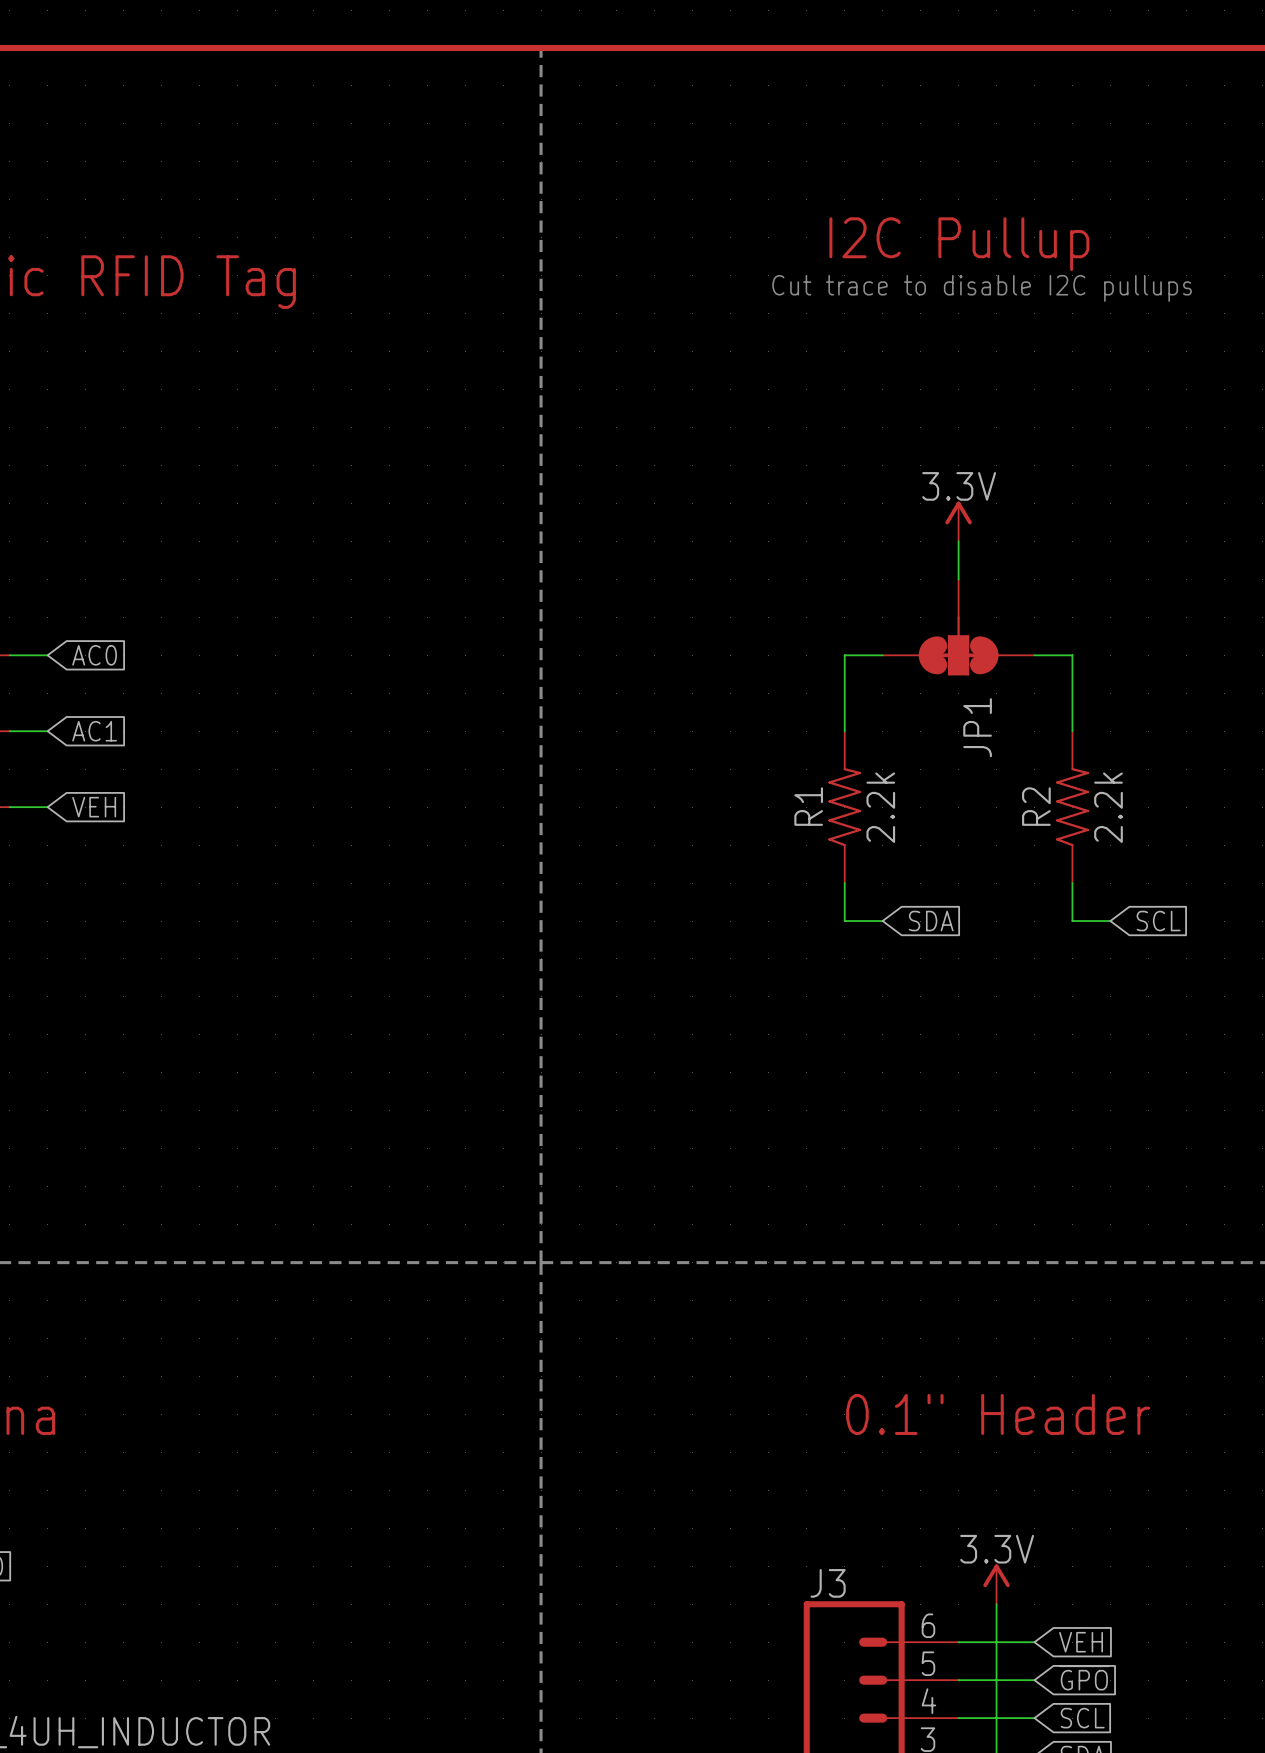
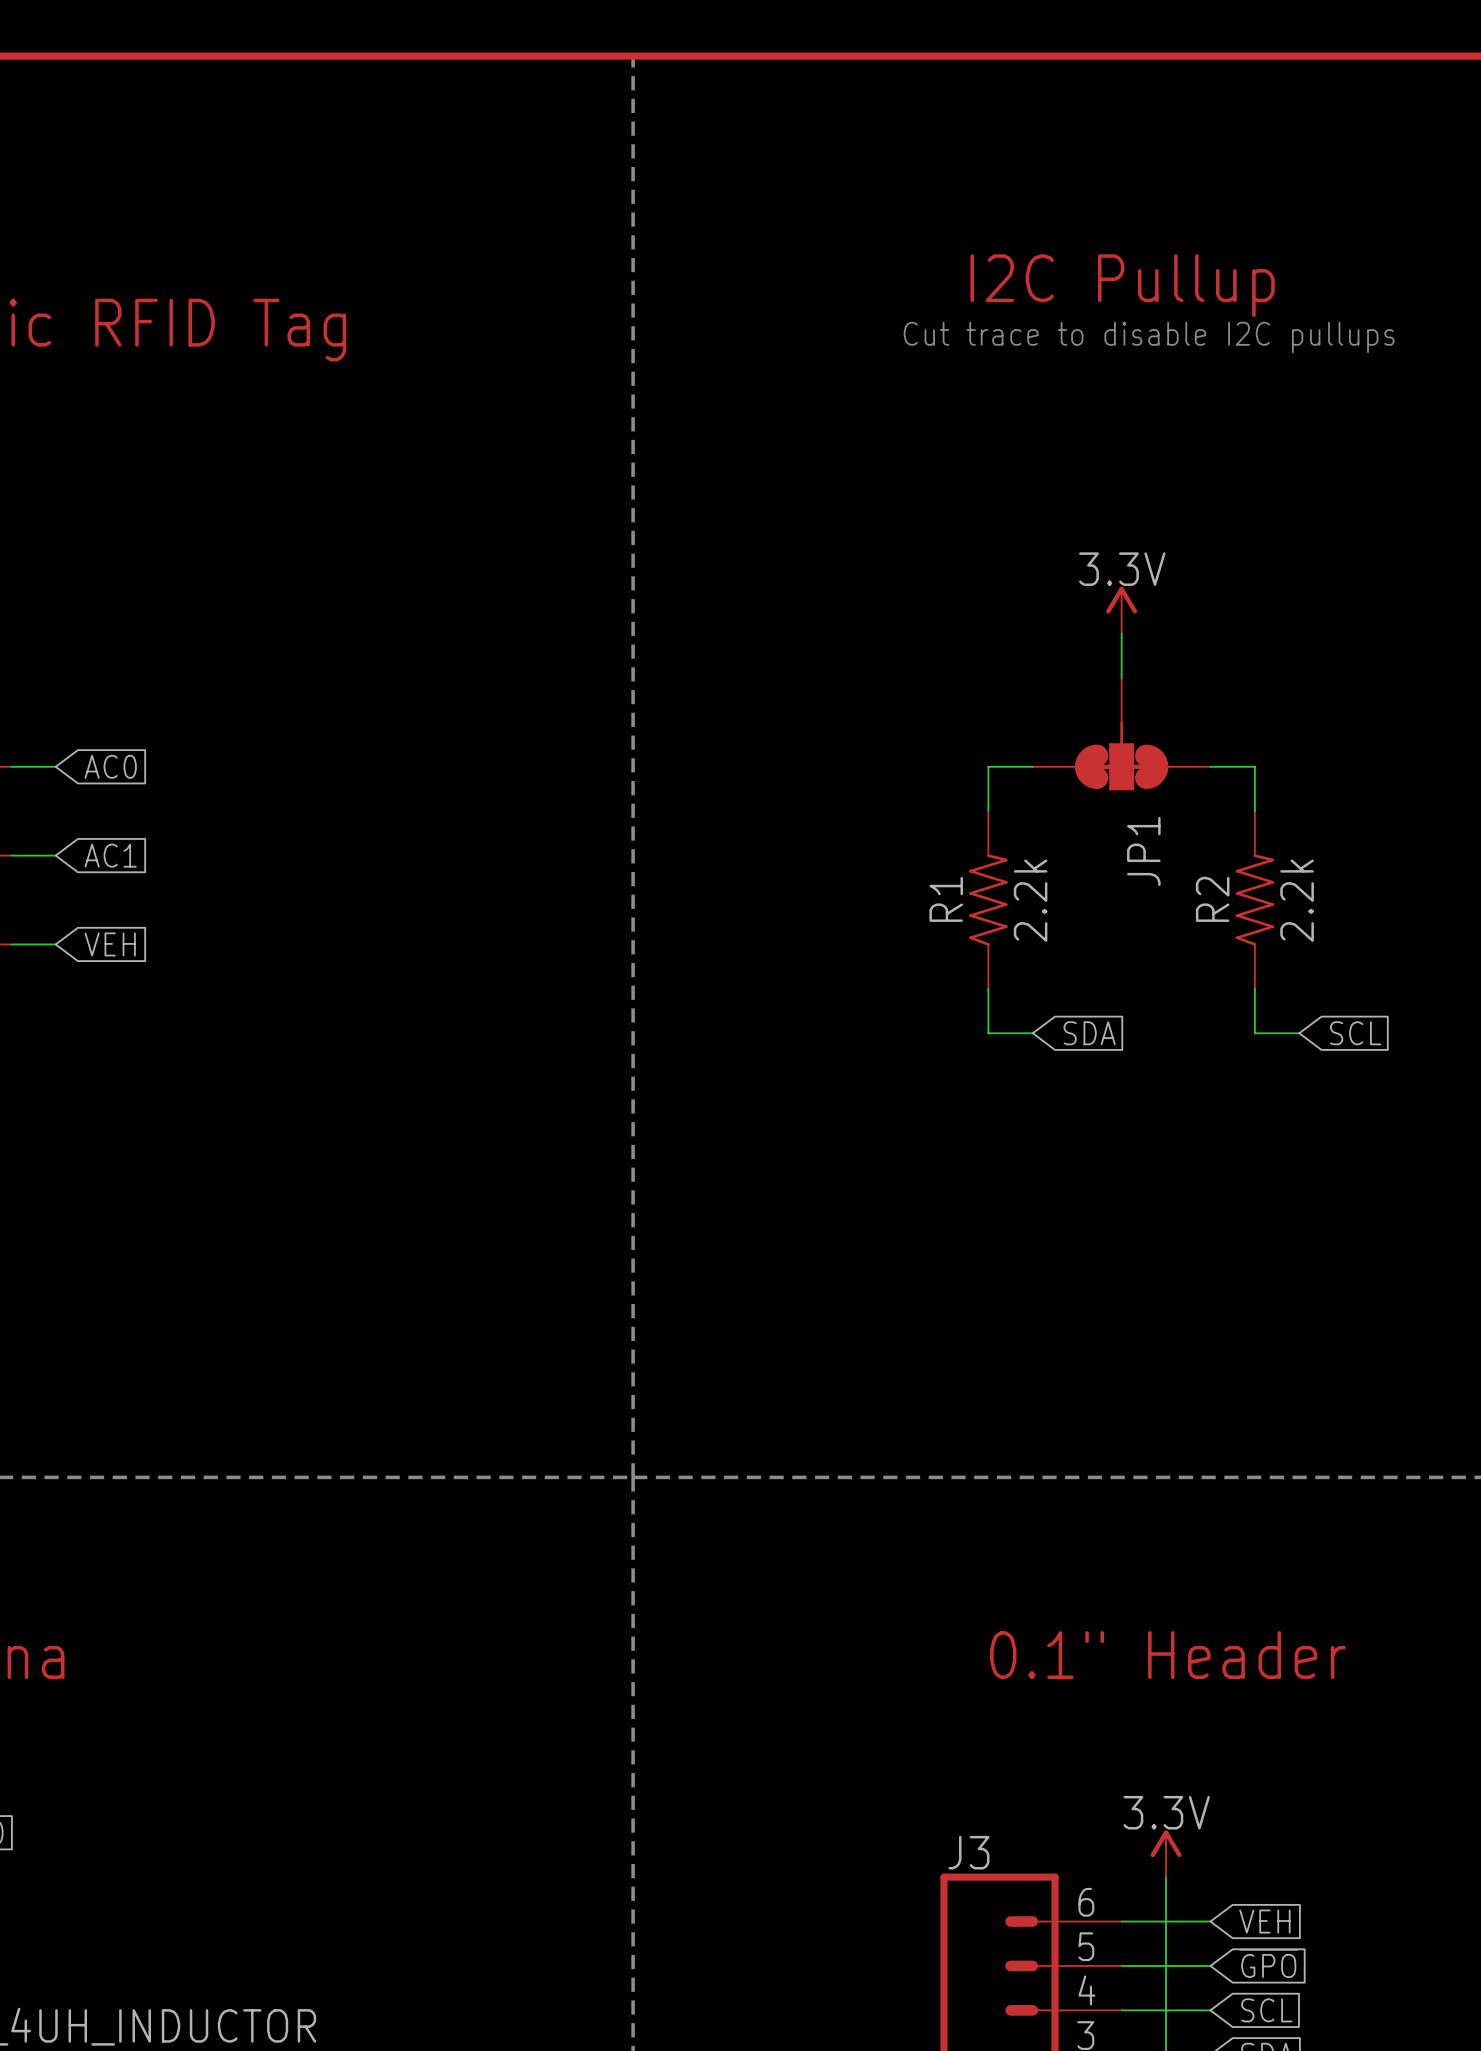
R1 position: (844, 807) -> (988, 900)
R2 position: (1072, 807) -> (1254, 900)
wire: (844, 883) (844, 921) (882, 921) -> (988, 988) (988, 1033) (1032, 1033)
wire: (1072, 883) (1072, 921) (1110, 921) -> (1254, 988) (1254, 1033) (1299, 1033)
global label position: SDA (931, 921) -> SDA (1089, 1033)
global label position: SCL (1158, 921) -> SCL (1355, 1033)

